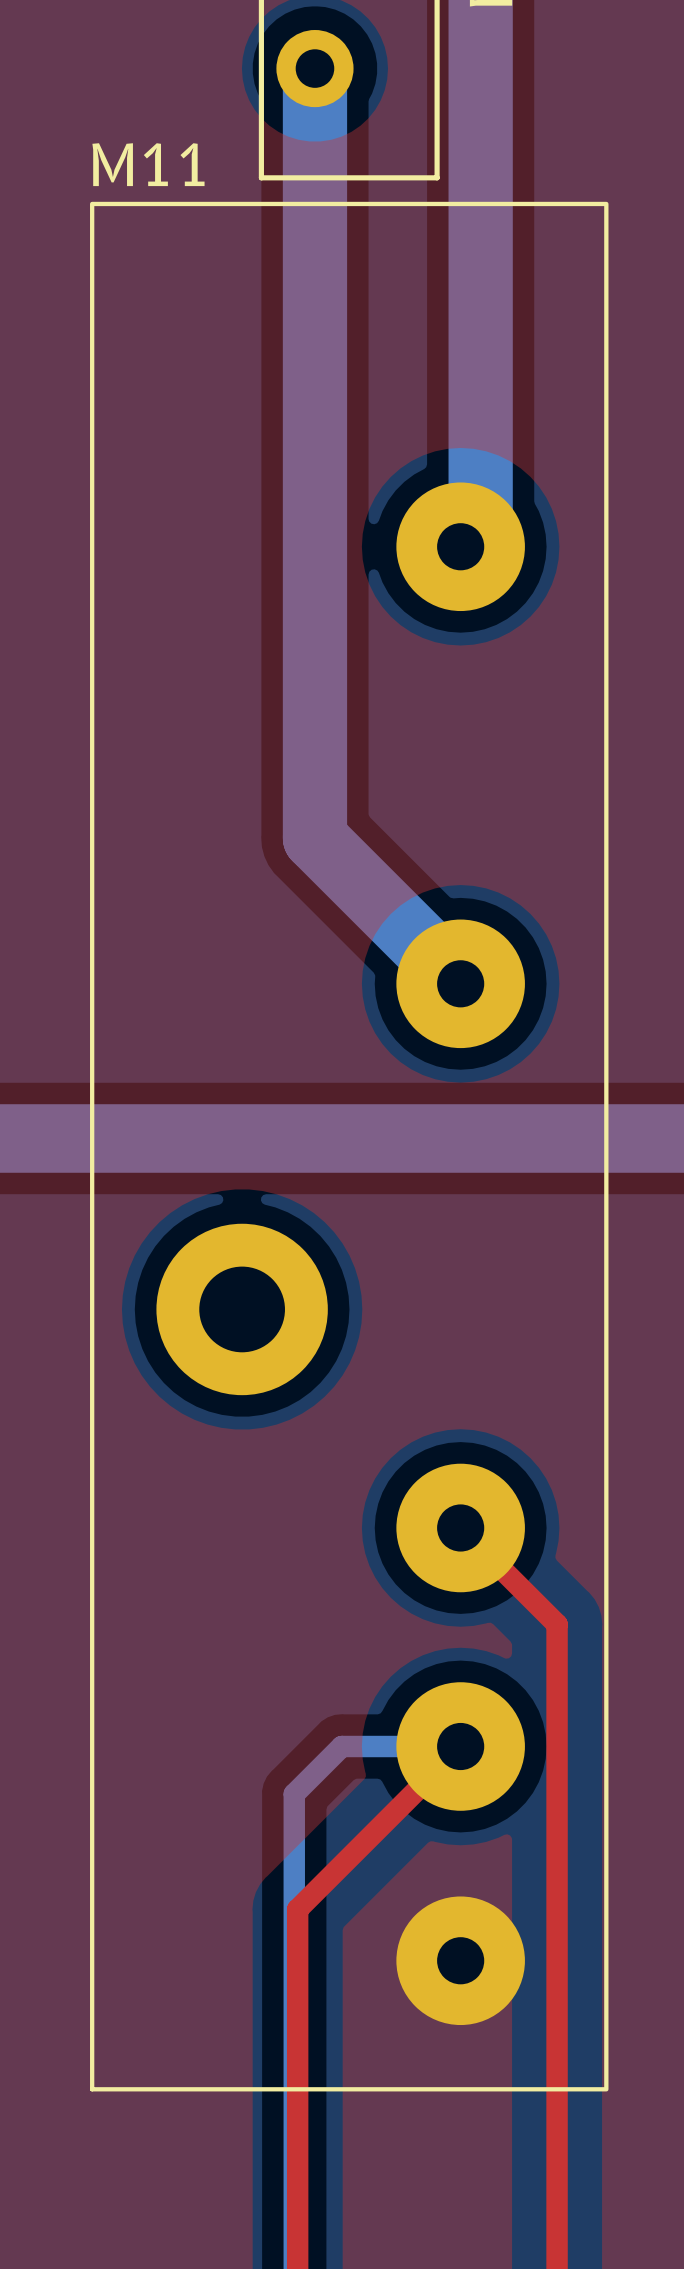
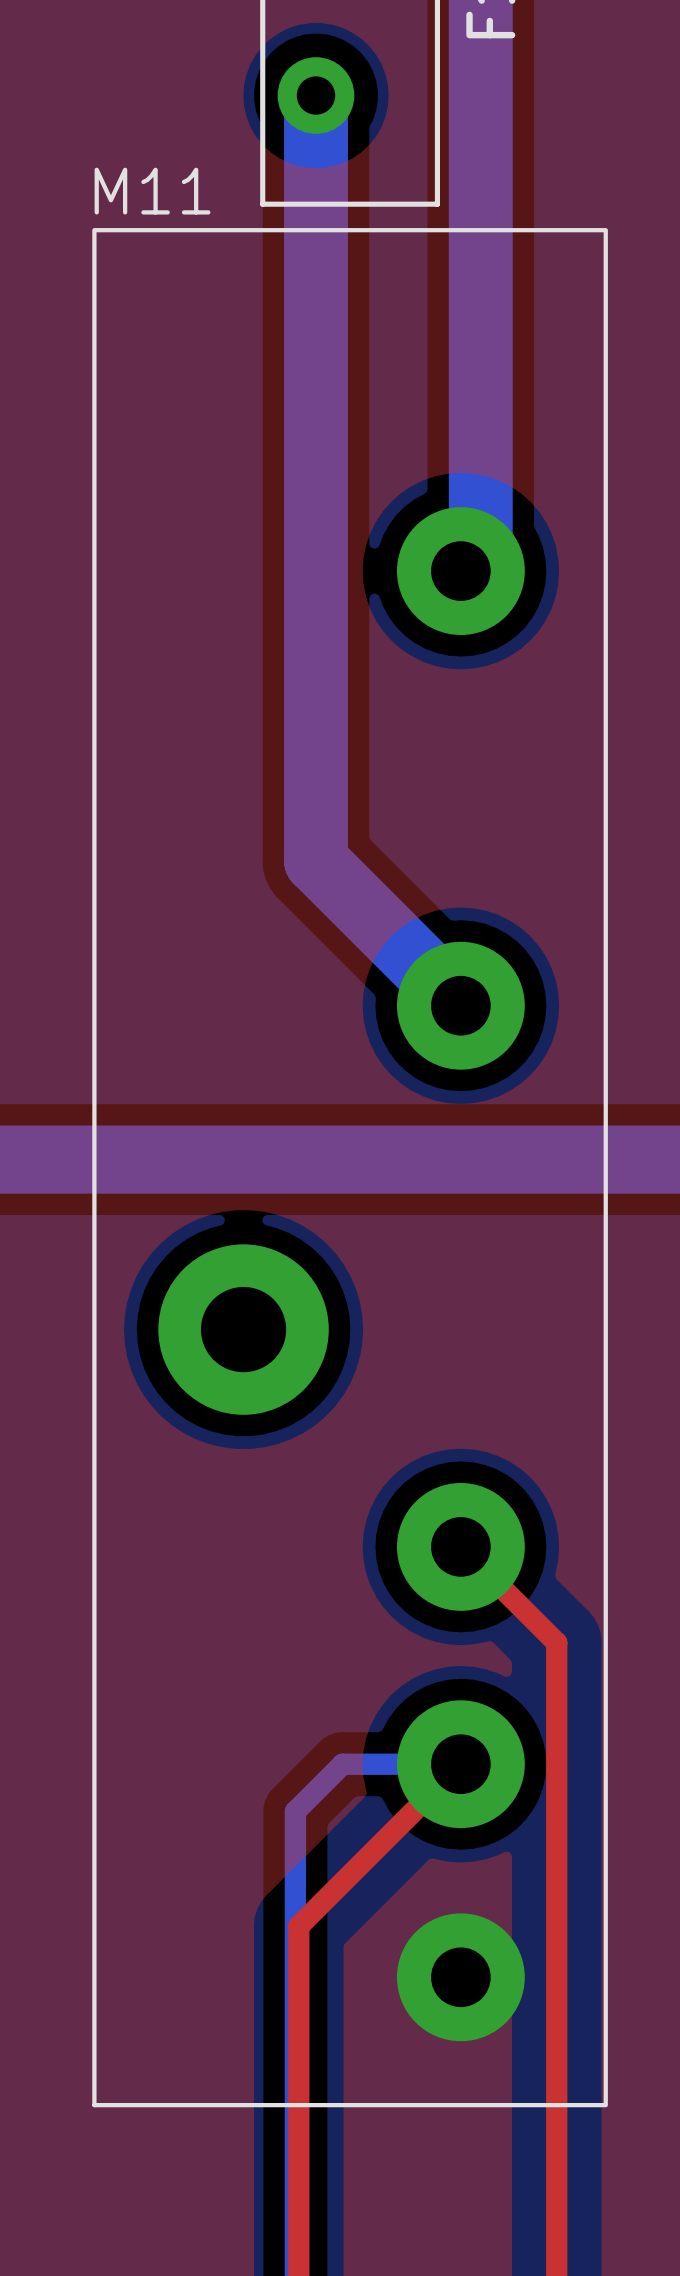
M11 footprint: [90, 201, 609, 2092] -> [92, 228, 608, 2108]

